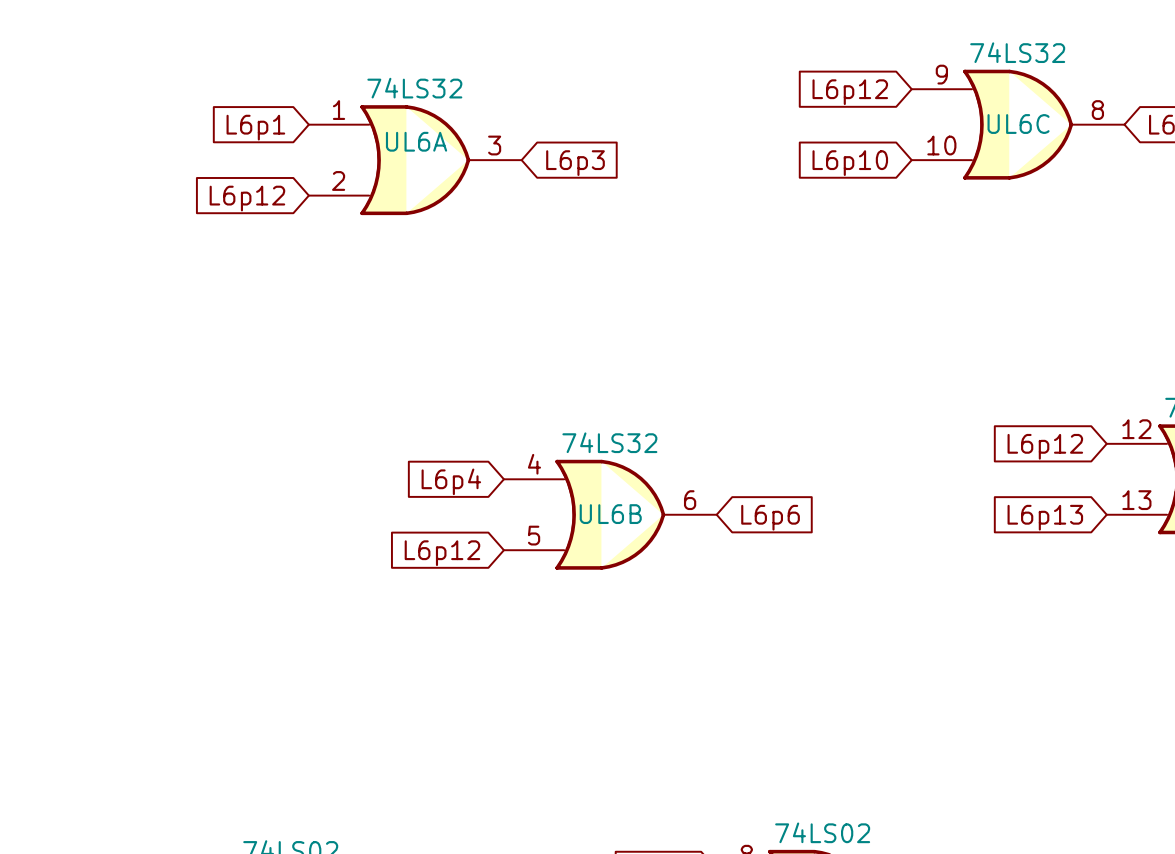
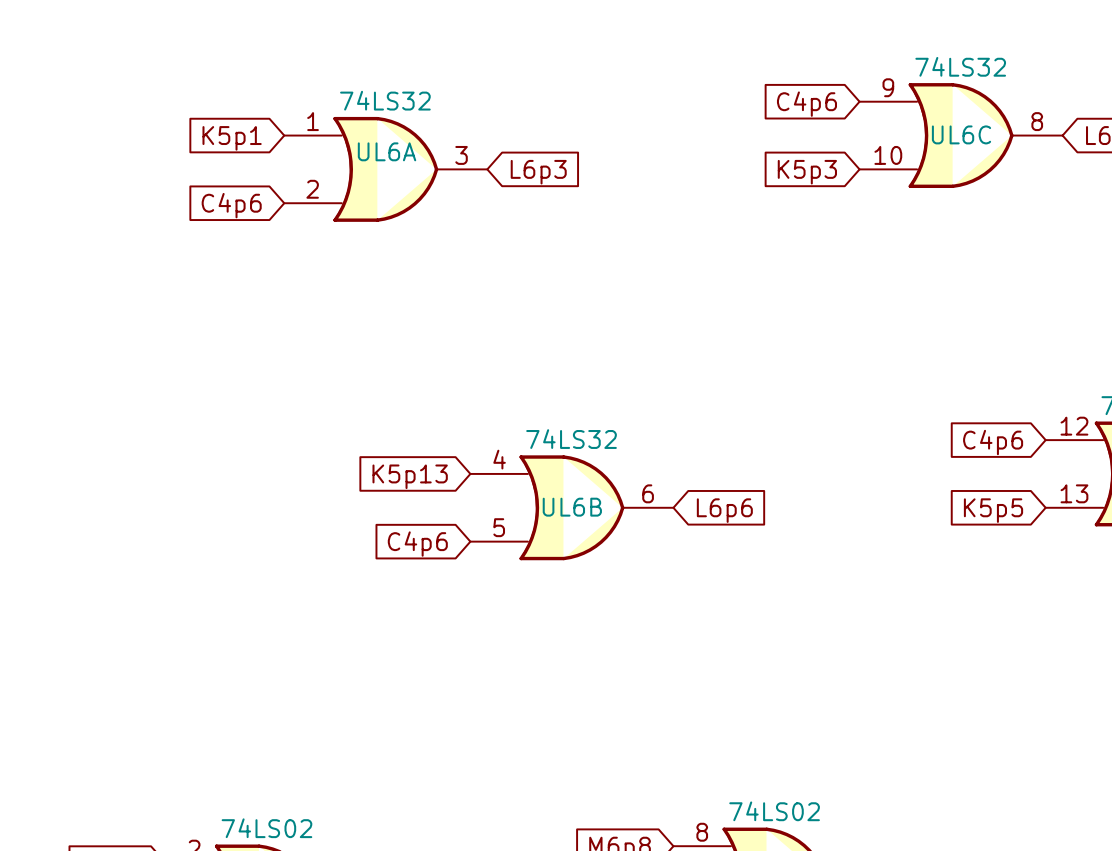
global label: L6p12 (850, 92) -> C4p6 (806, 104)
global label: L6p1 (255, 127) -> K5p1 (232, 138)
global label: L6p10 (850, 163) -> K5p3 (807, 172)
global label: L6p12 (247, 198) -> C4p6 (231, 205)
global label: L6p12 (1045, 446) -> C4p6 (993, 442)
global label: L6p4 (451, 481) -> K5p13 (410, 476)
global label: L6p13 (1045, 517) -> K5p5 (993, 510)
global label: L6p12 (442, 553) -> C4p6 (417, 544)

